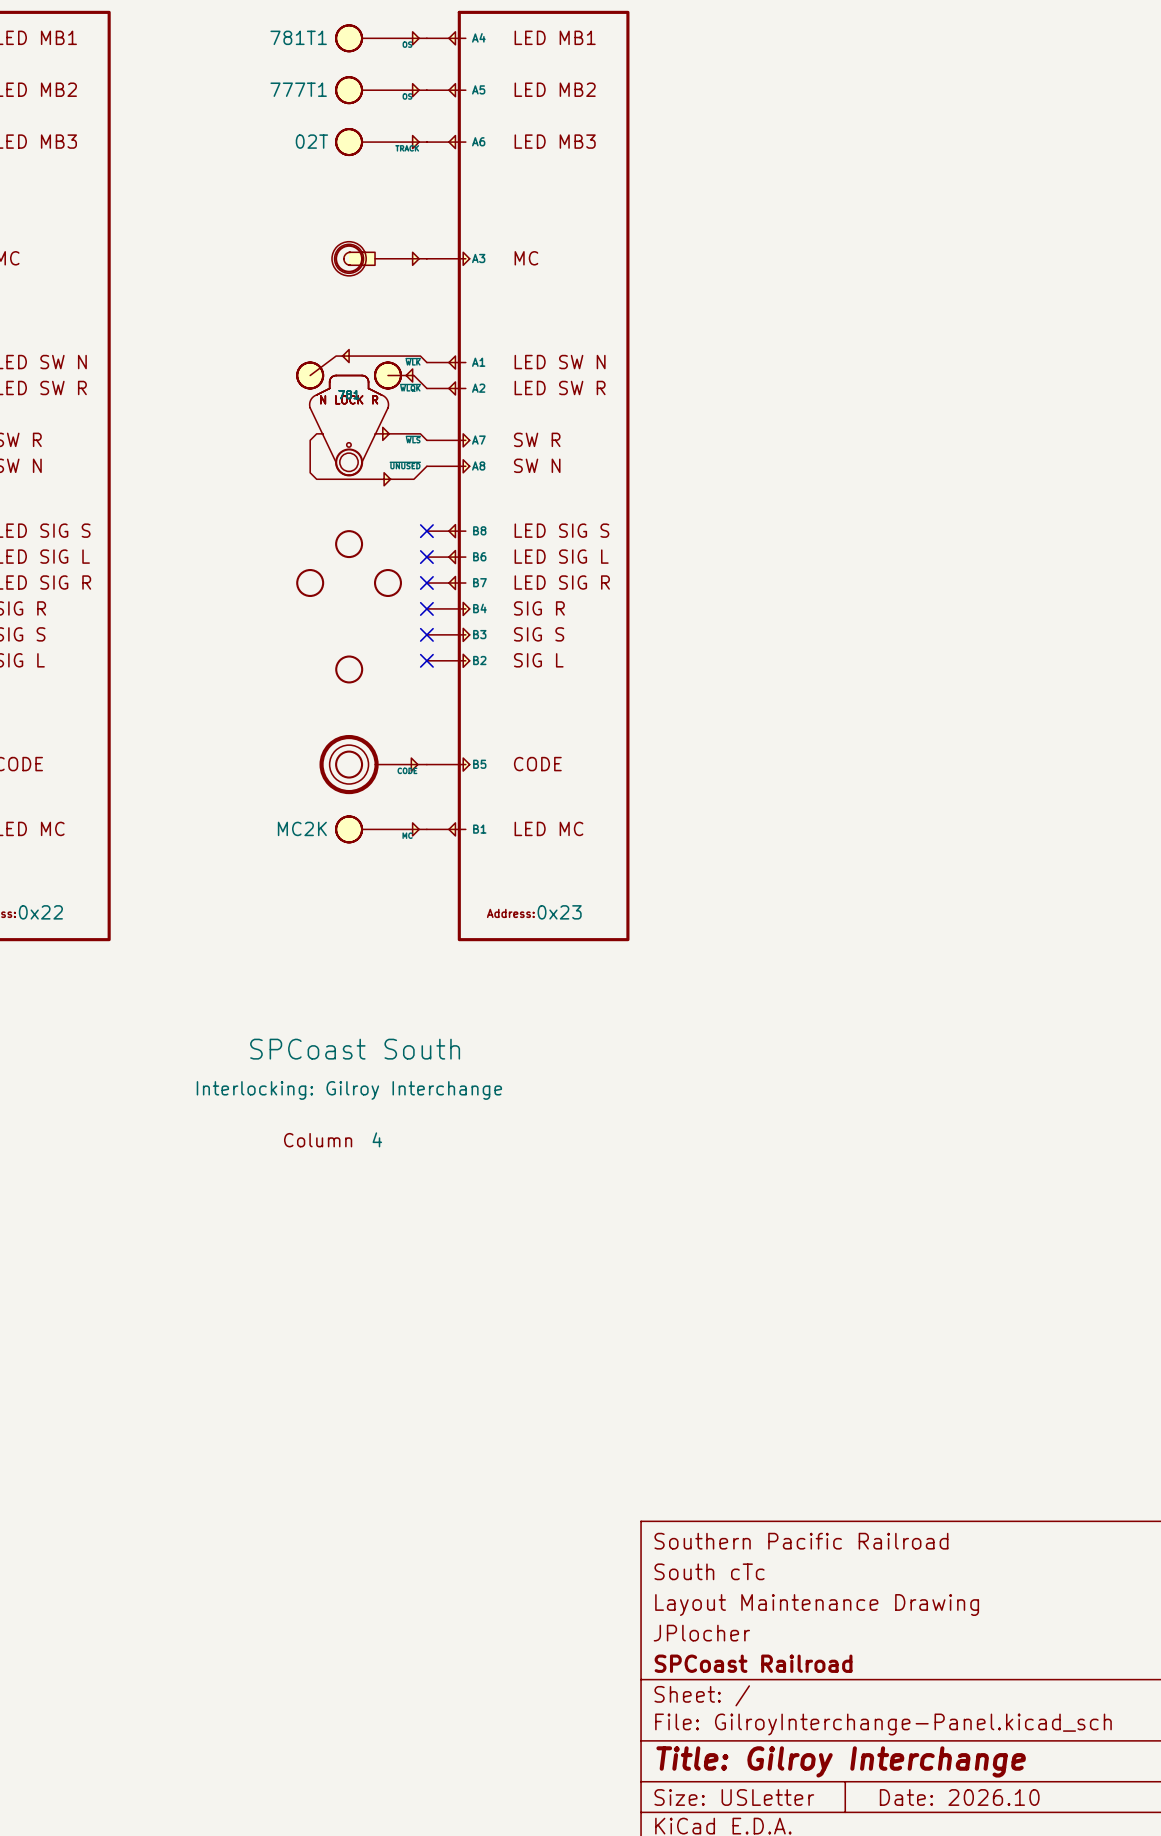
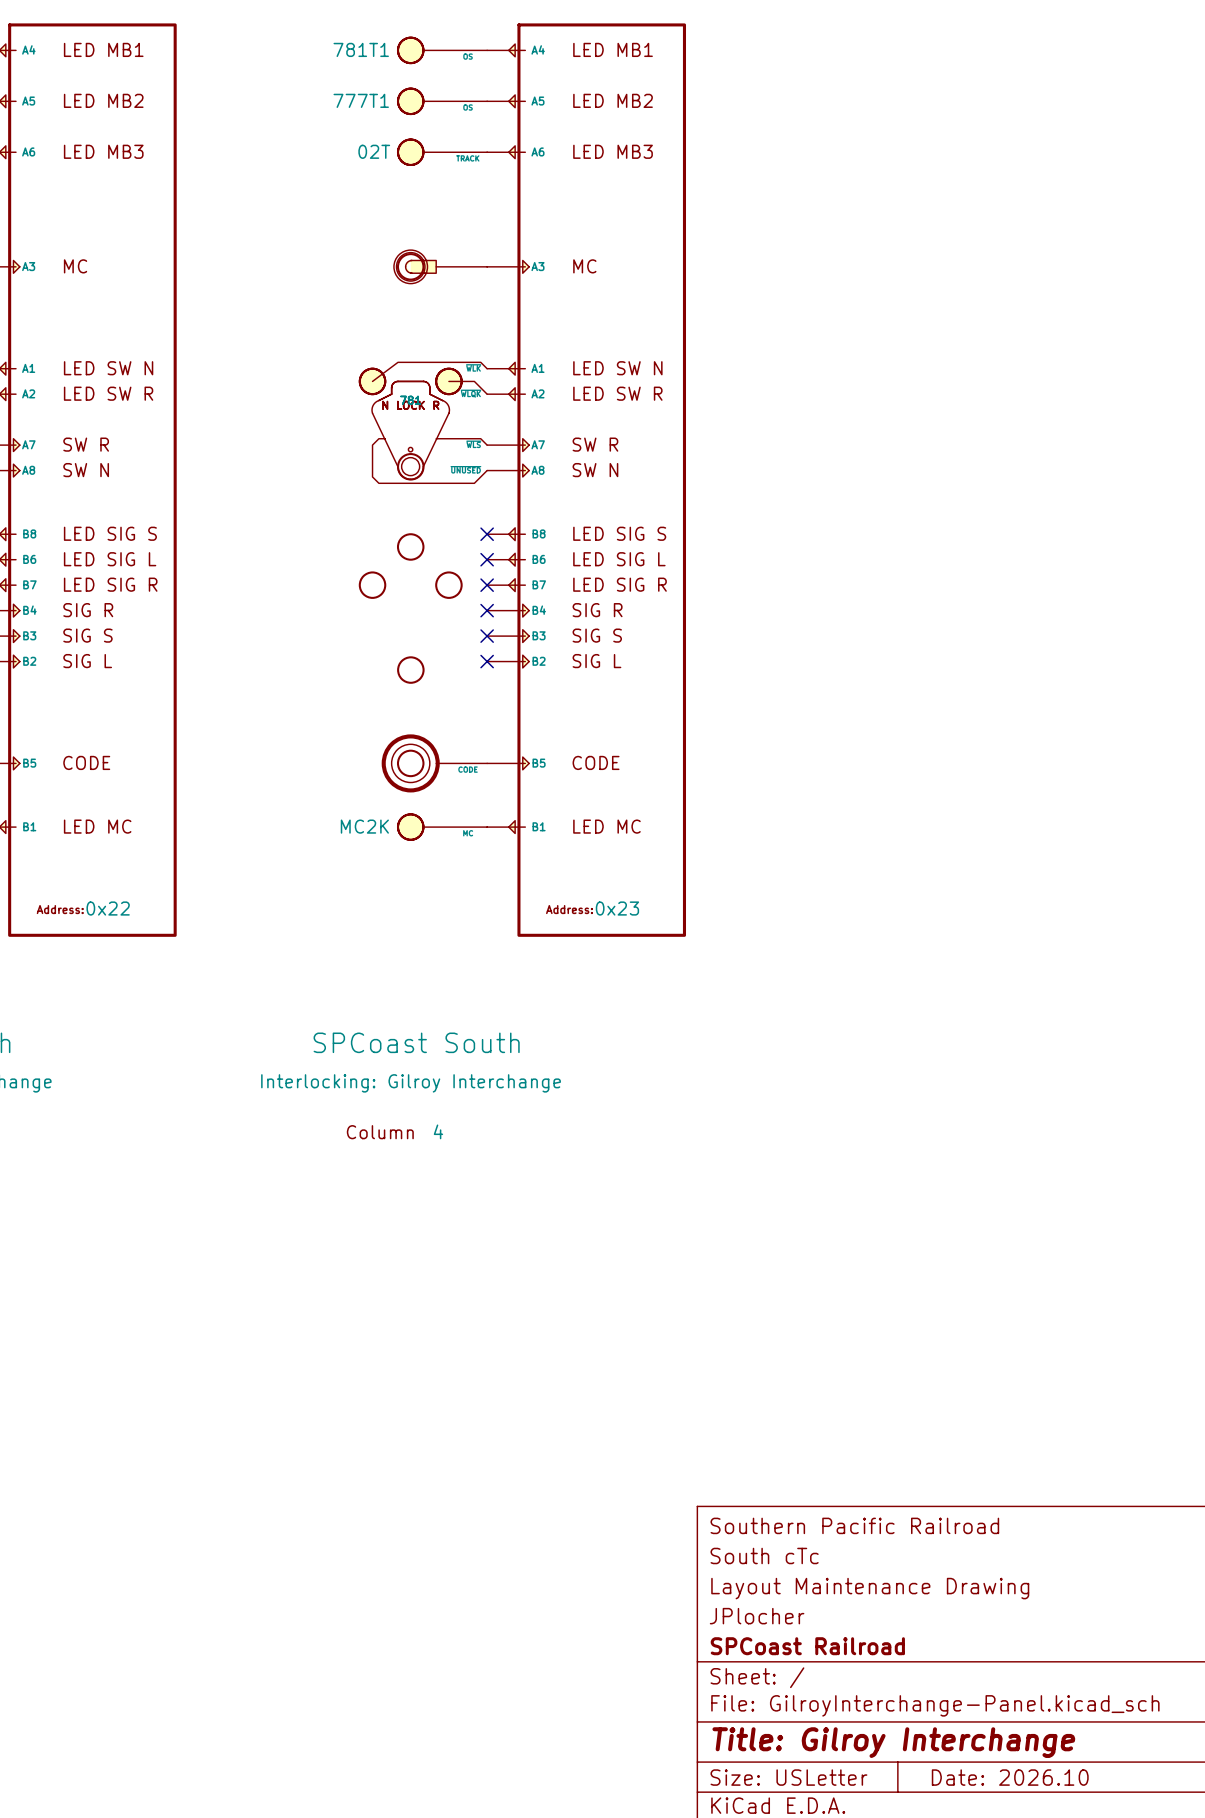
part symbol: [335, 24, 427, 53] -> [396, 36, 488, 65]
part symbol: [335, 76, 427, 105] -> [396, 87, 488, 116]
part symbol: [335, 128, 427, 157] -> [396, 138, 488, 167]
part symbol: [332, 241, 427, 276] -> [393, 250, 488, 284]
part symbol: [296, 349, 427, 395] -> [358, 362, 488, 401]
part symbol: [309, 375, 427, 486] -> [372, 381, 488, 484]
part symbol: [319, 734, 427, 795] -> [381, 734, 488, 793]
part symbol: [335, 815, 427, 844] -> [396, 813, 488, 841]

